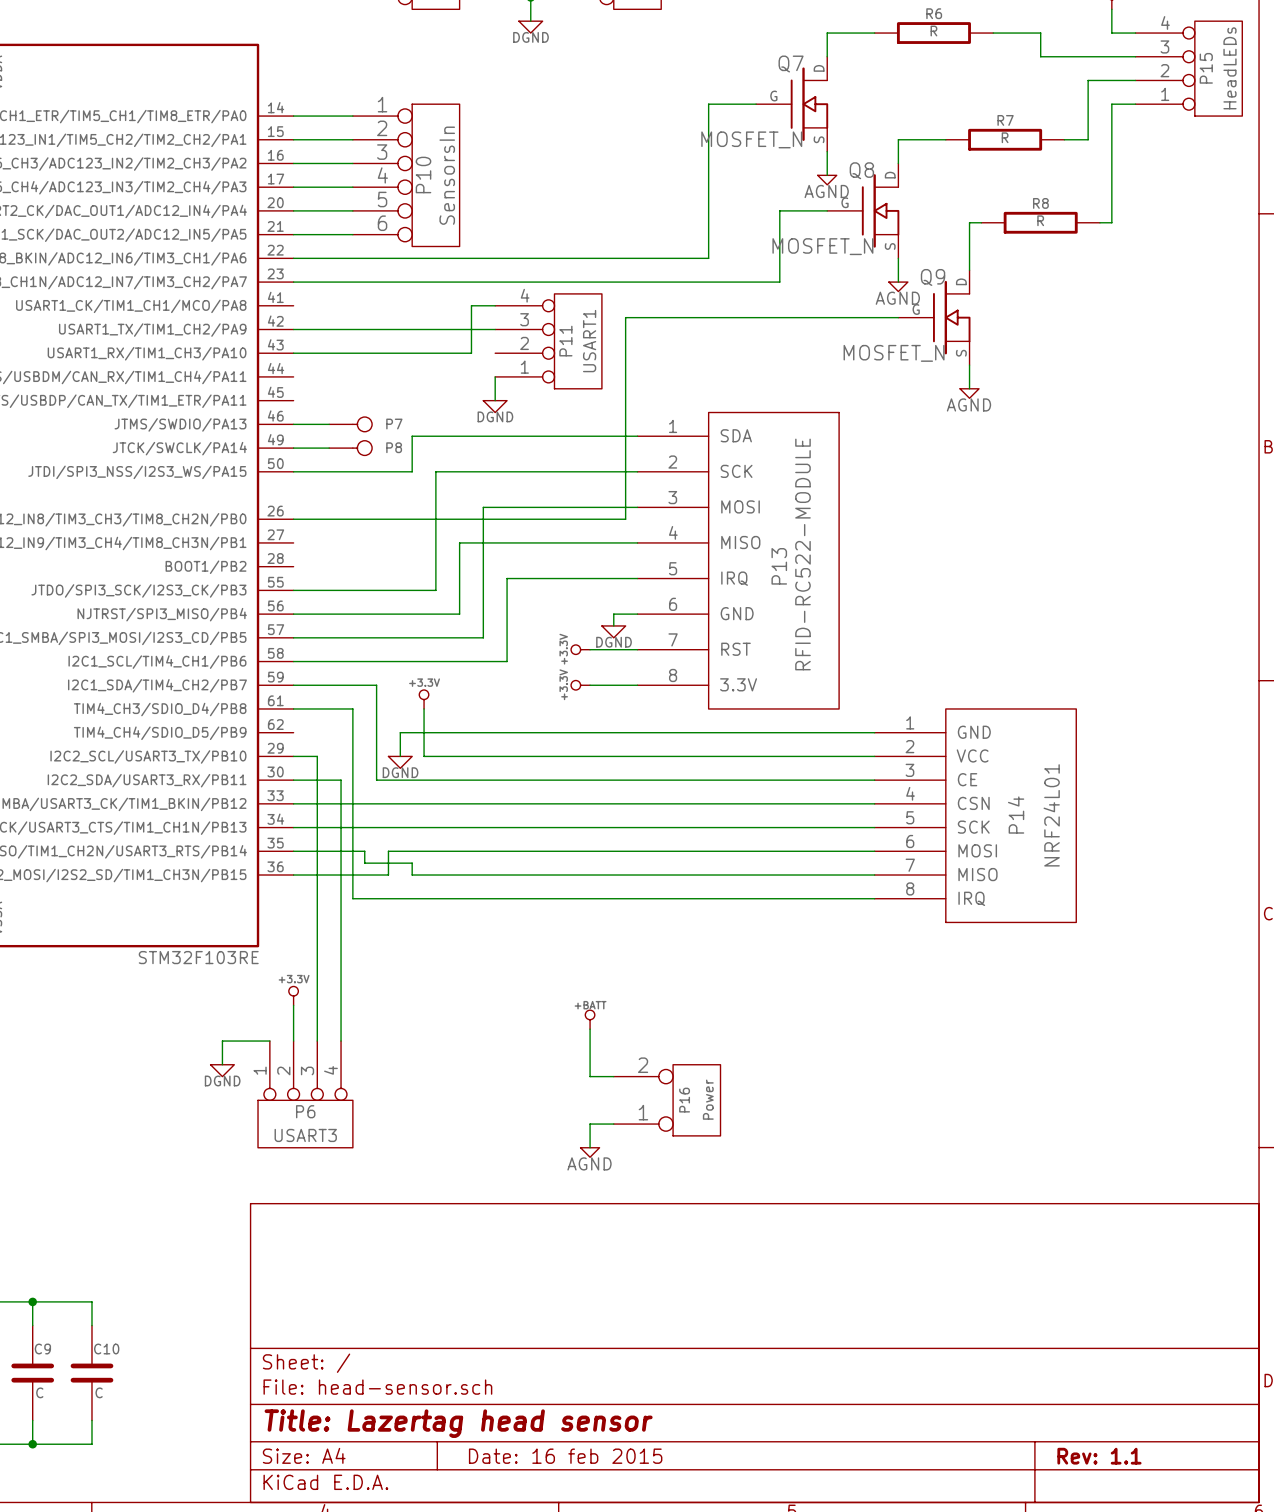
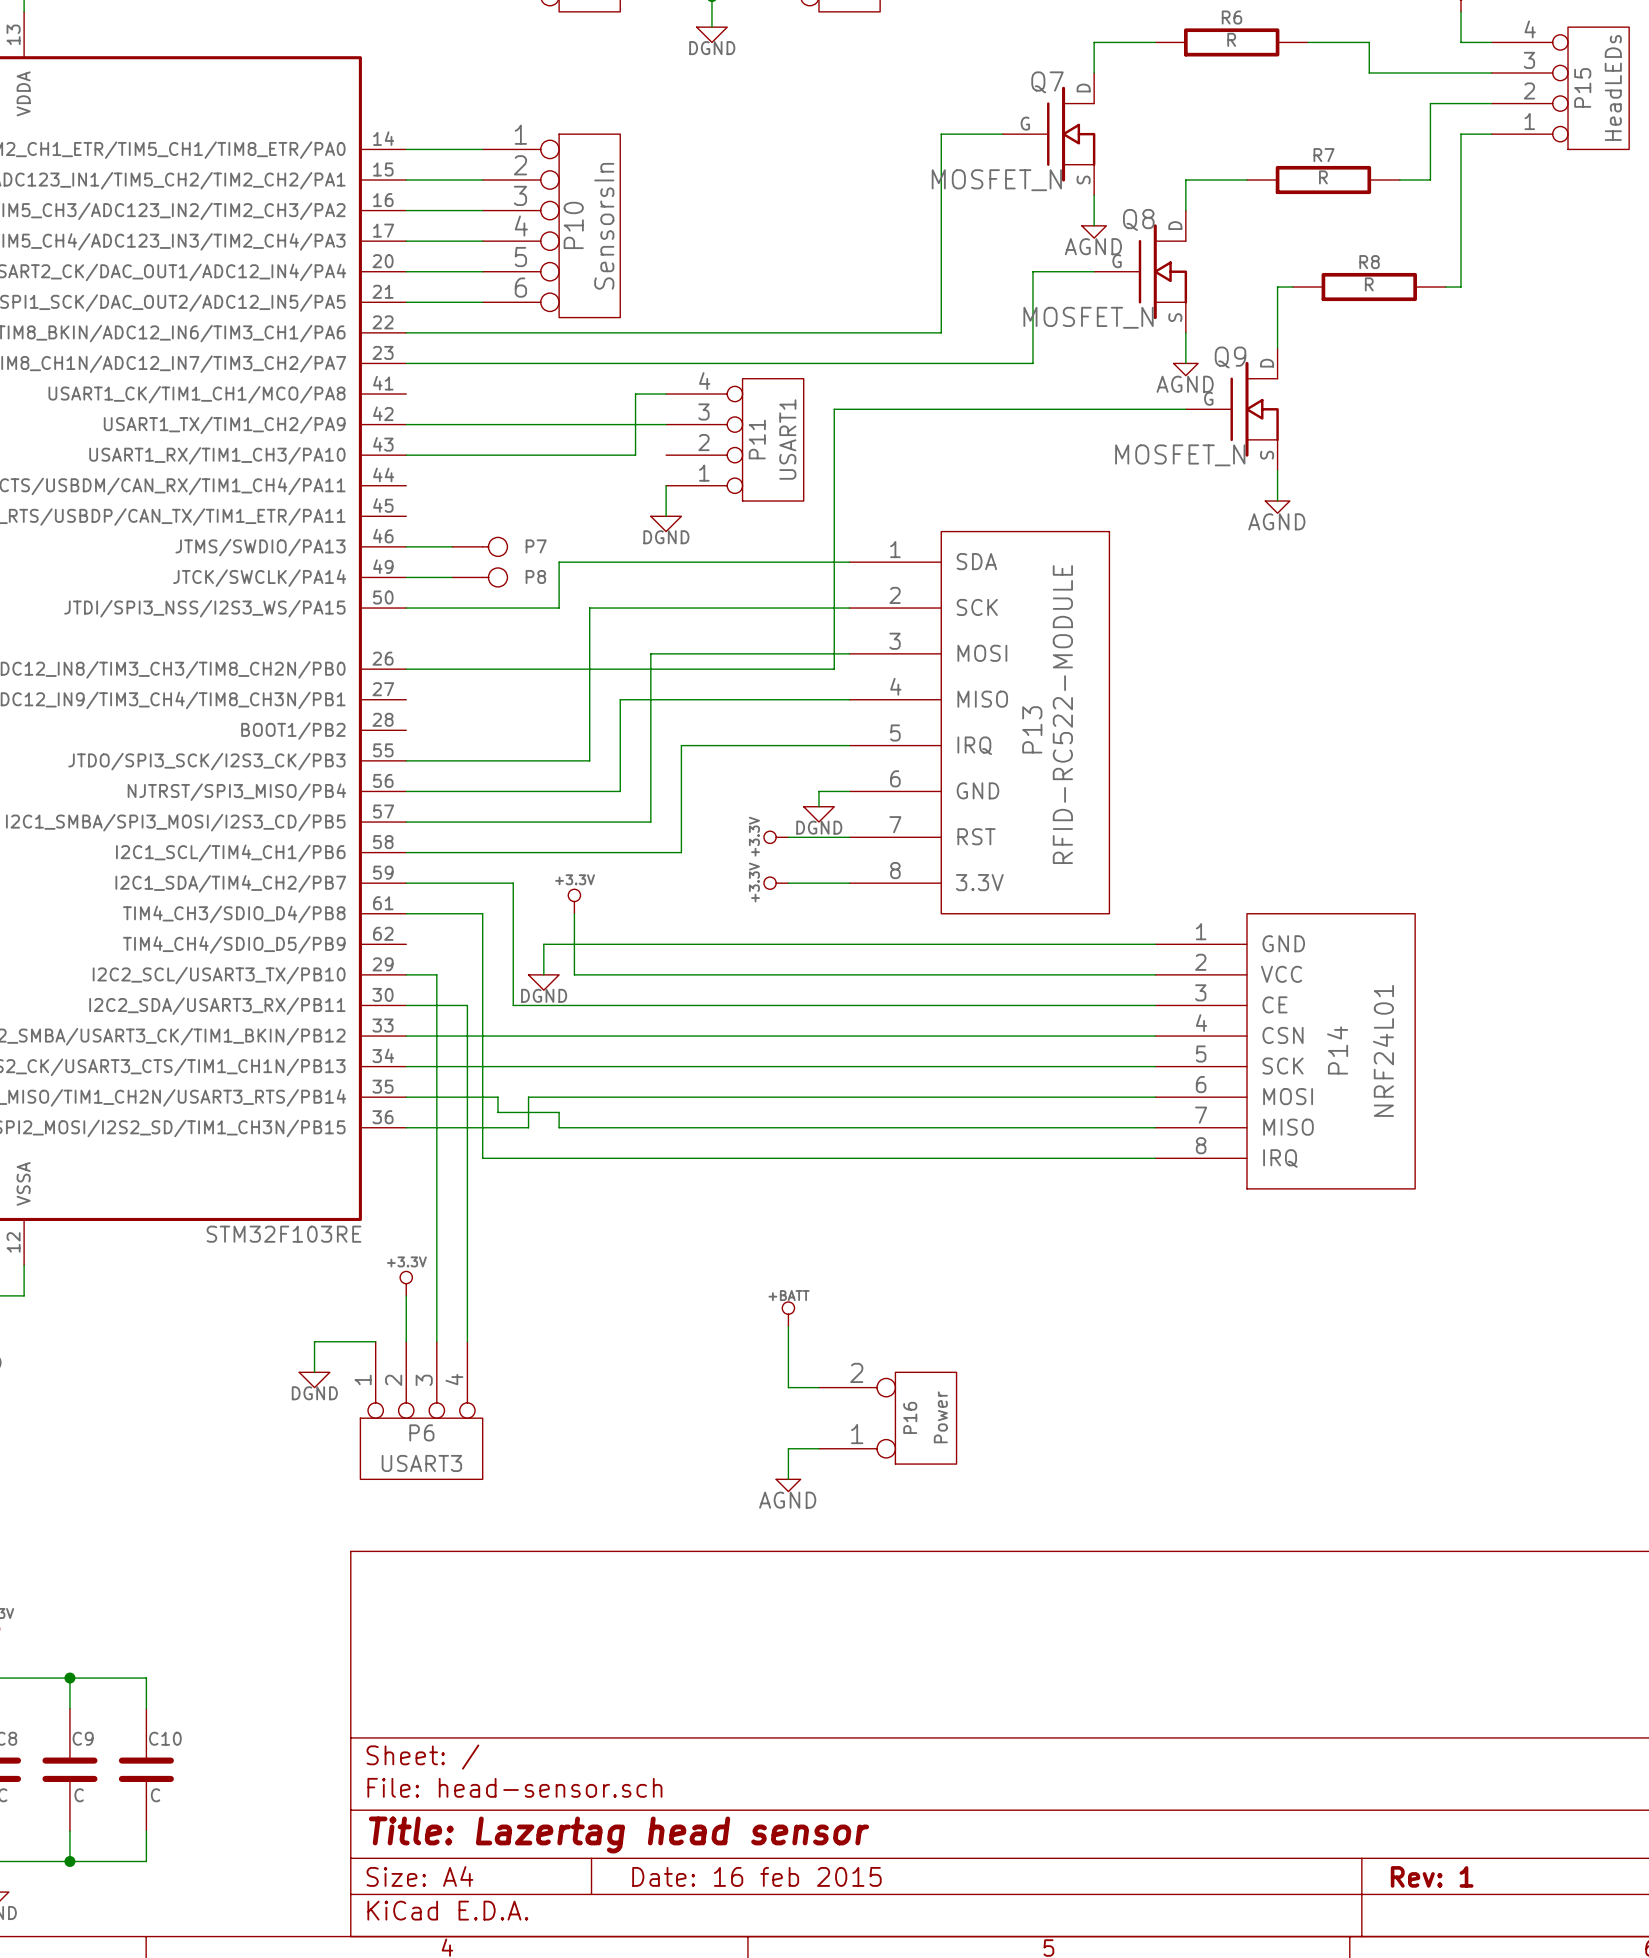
title block: Rev: 1.1 (1099, 1456) -> Rev: 1 (1432, 1876)

